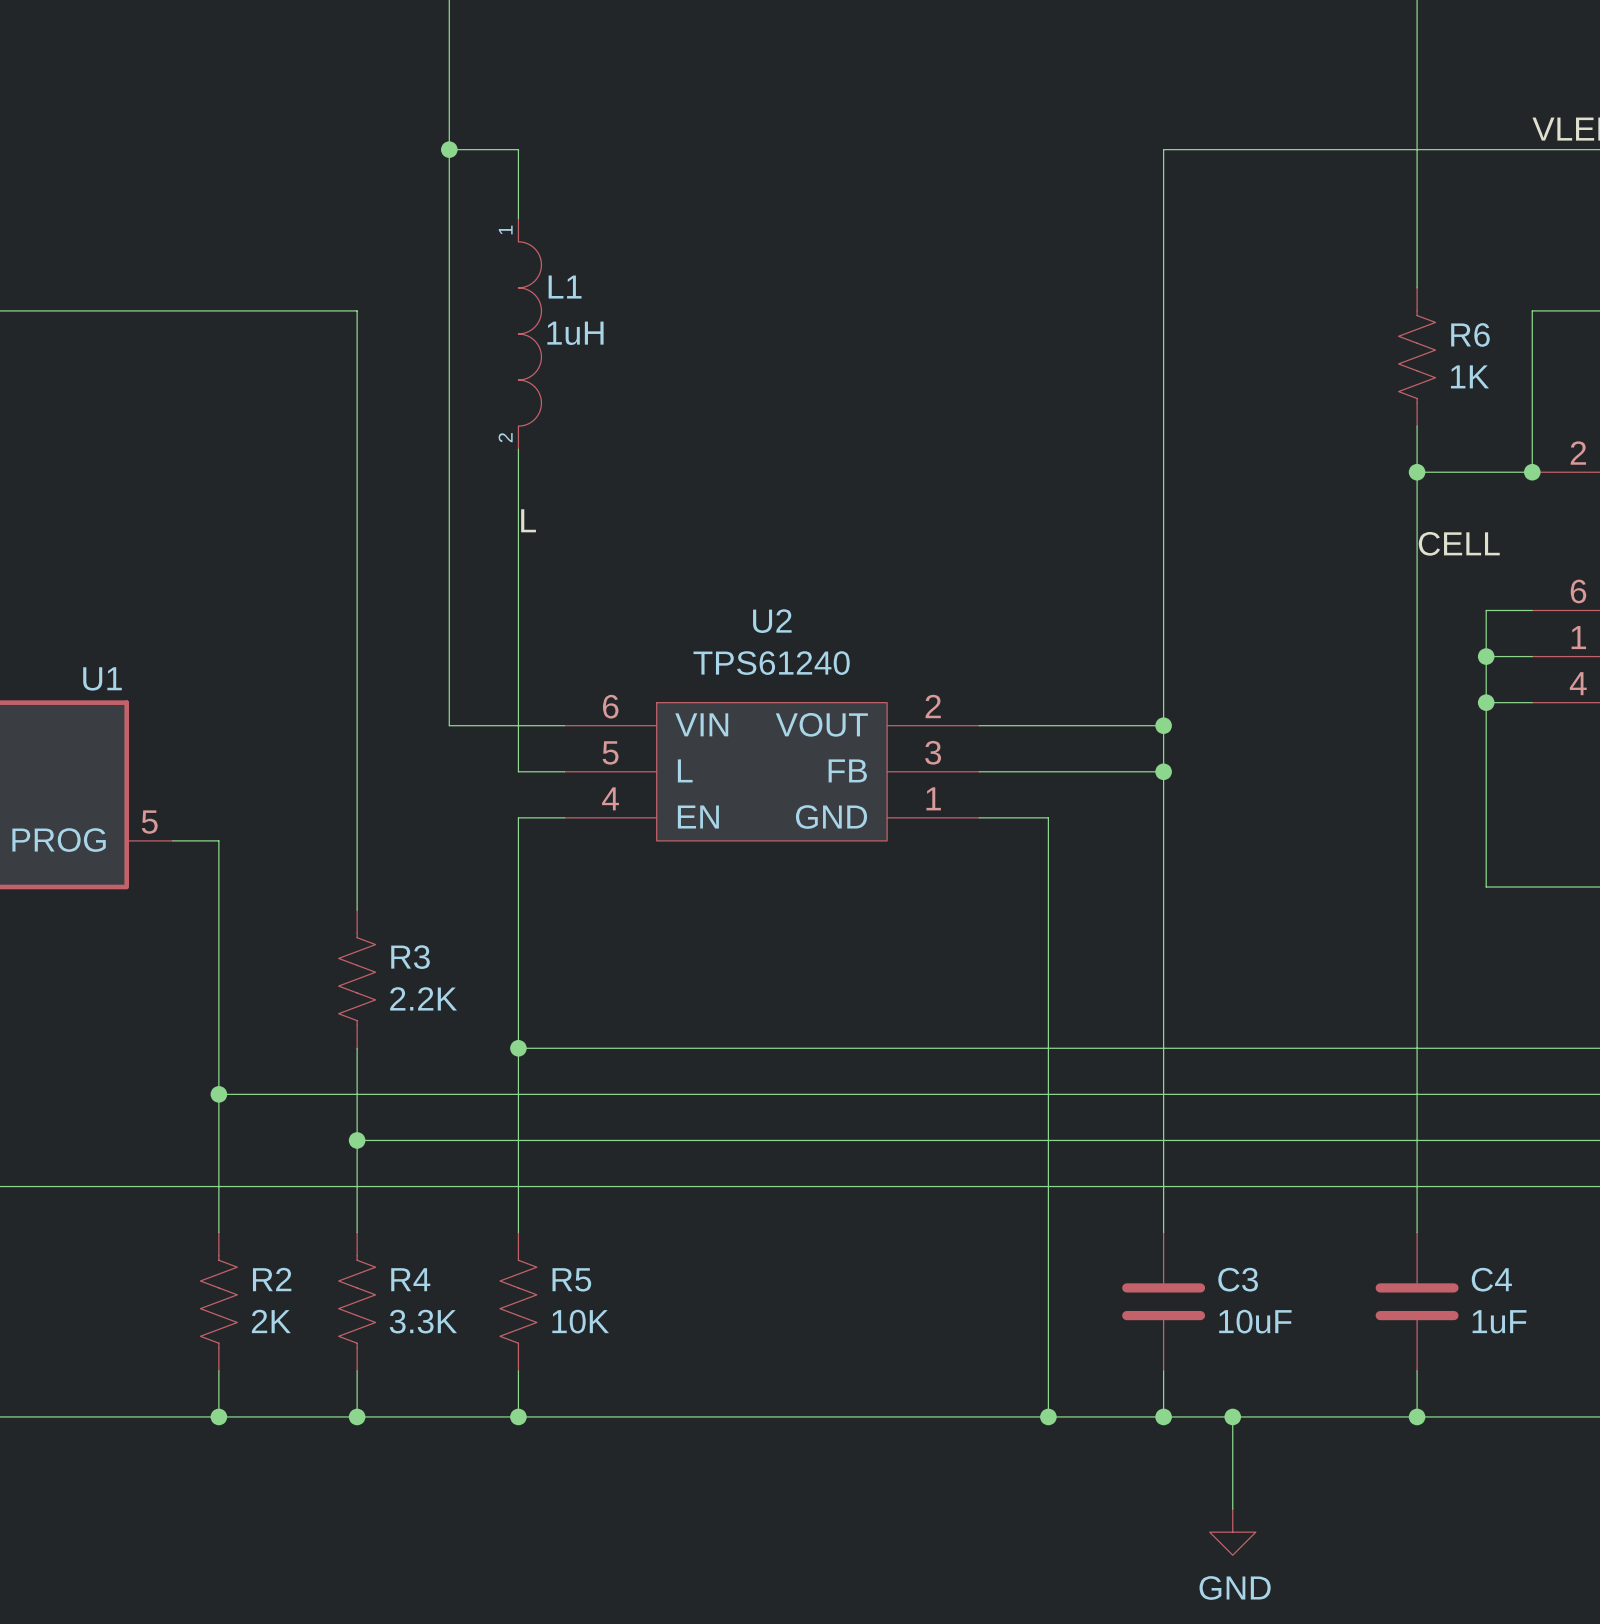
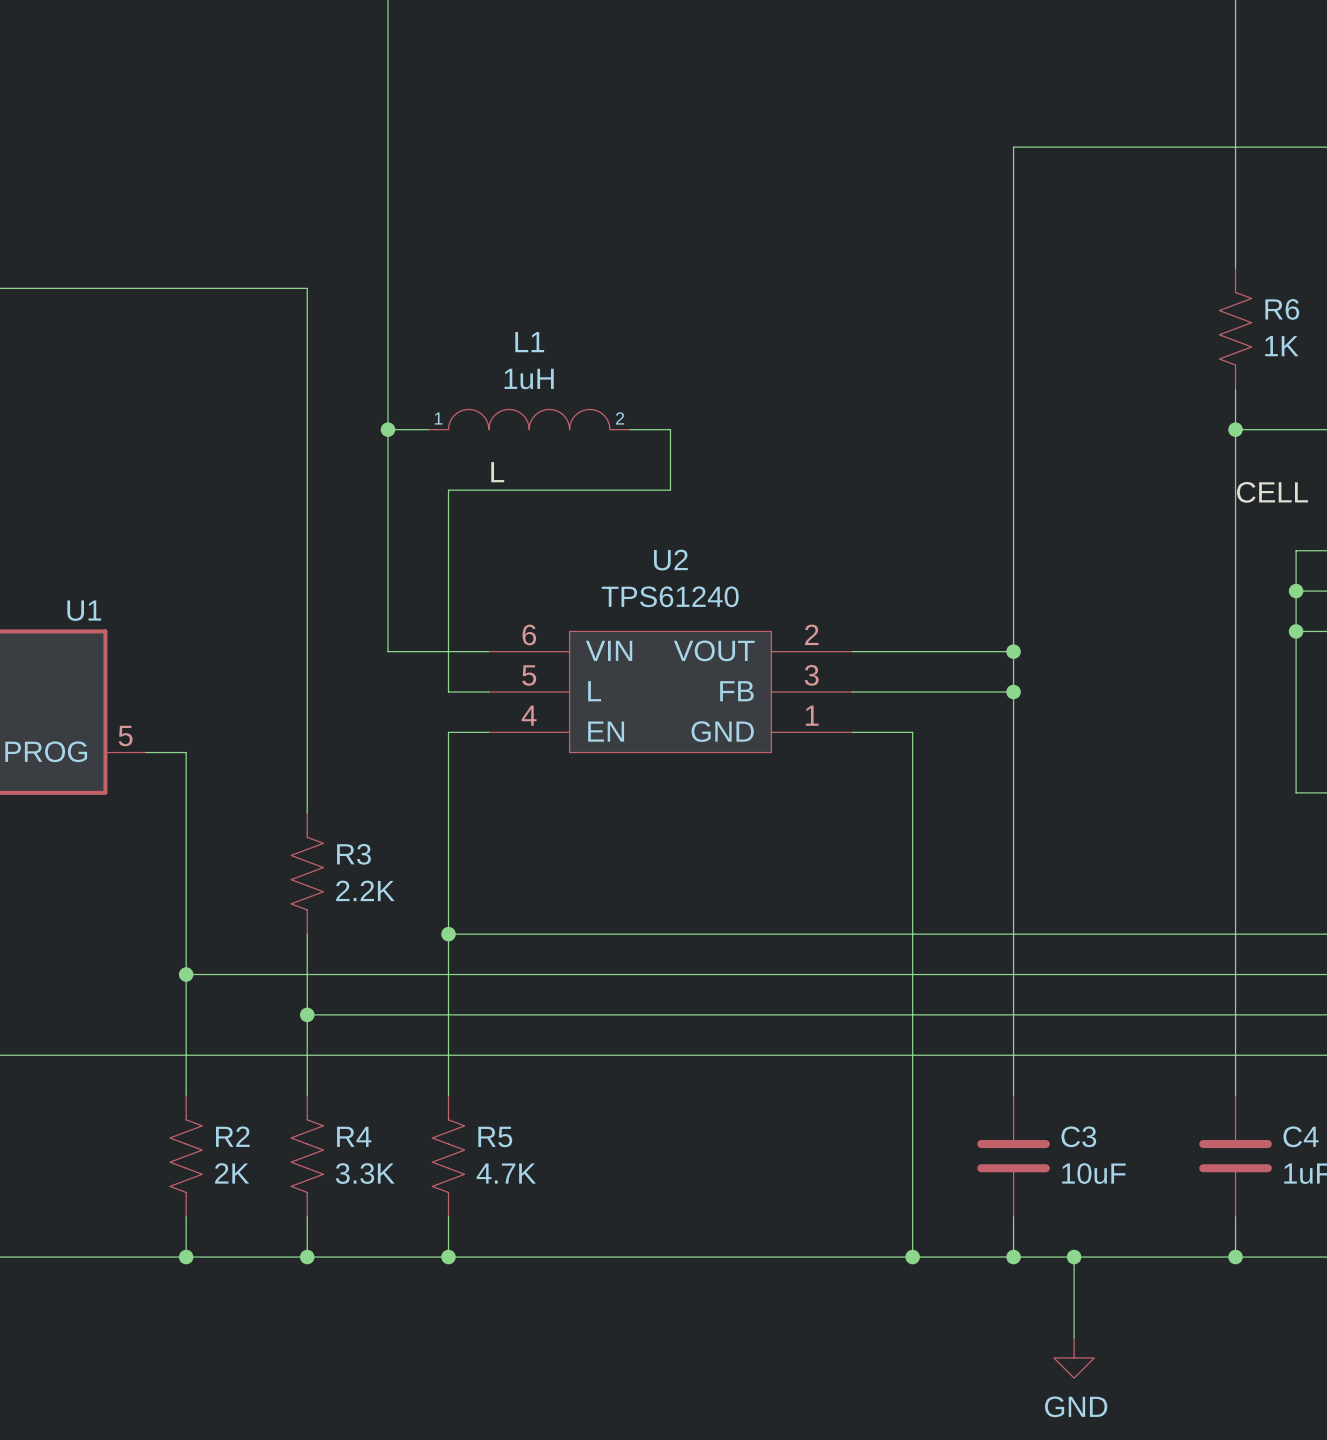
wire: (449, 149) (518, 149) (518, 218) -> none
junction: (449, 149) -> none
L1 name position: L1 (565, 287) -> L1 (529, 342)
L1 rotation: 0° (529, 333) -> 90° counterclockwise (529, 419)
L1 position: (529, 333) -> (529, 419)
wire: (518, 449) (518, 541) -> (630, 429) (670, 429) (670, 490) (448, 490)
wire: none -> (387, 429) (428, 429)
junction: none -> (387, 429)
label position: L (528, 520) -> L (497, 472)
R5 value: 10K (580, 1321) -> 4.7K (506, 1173)

